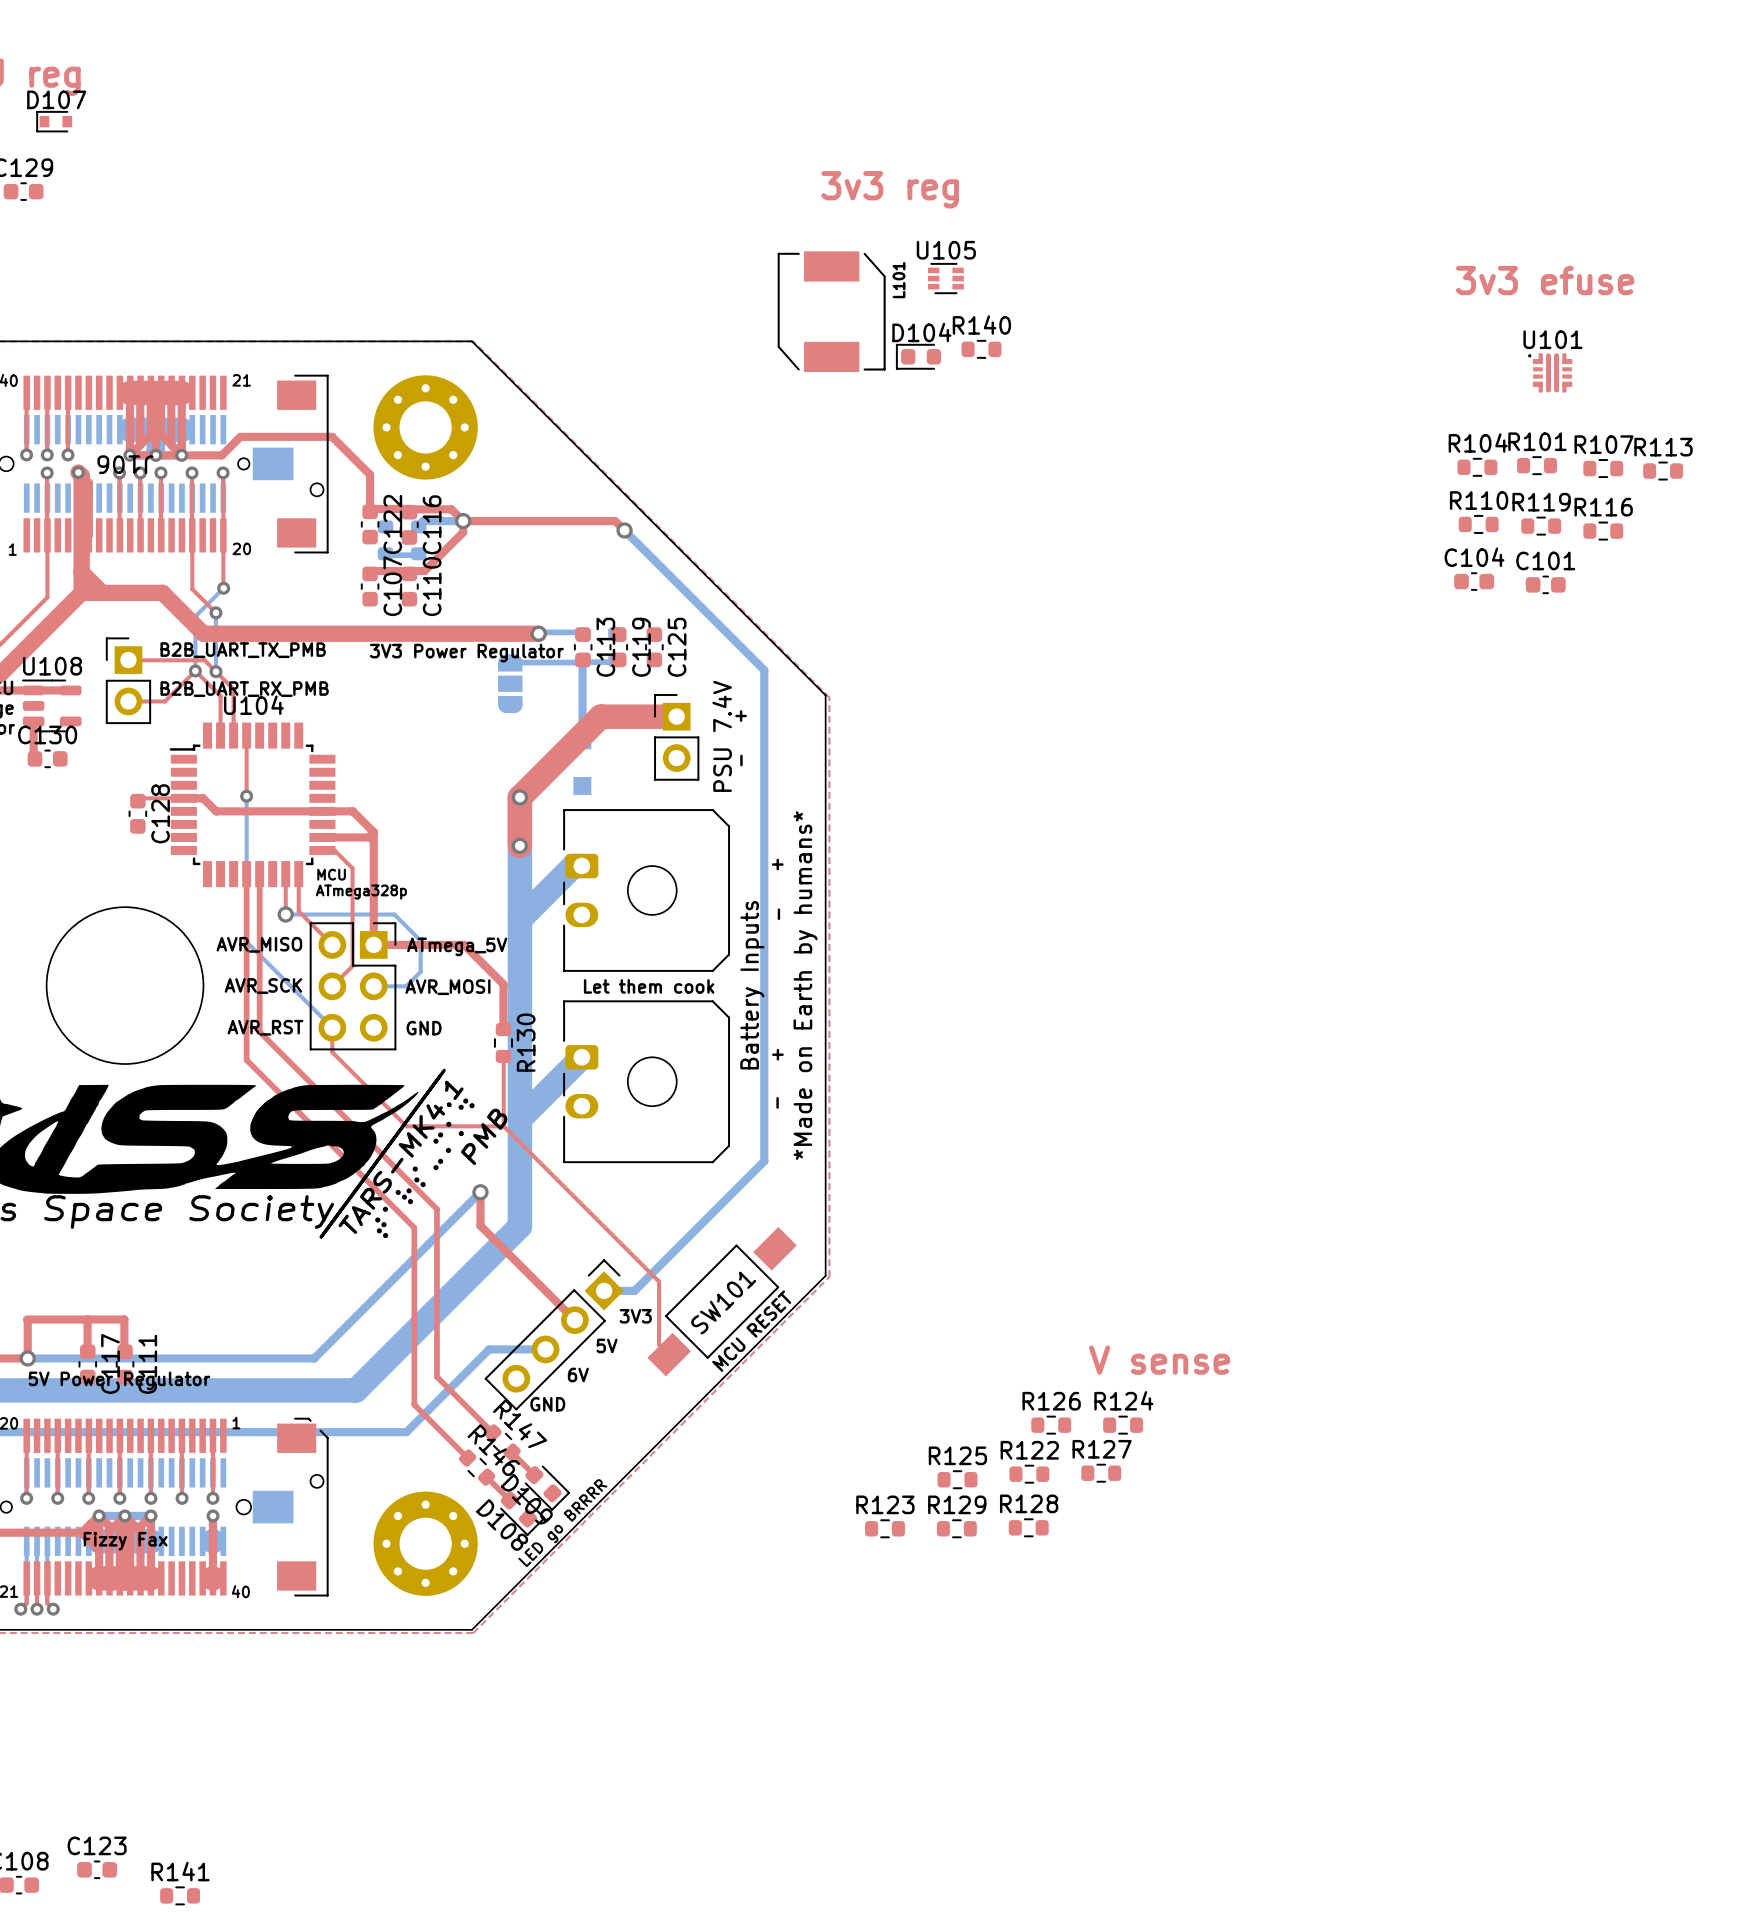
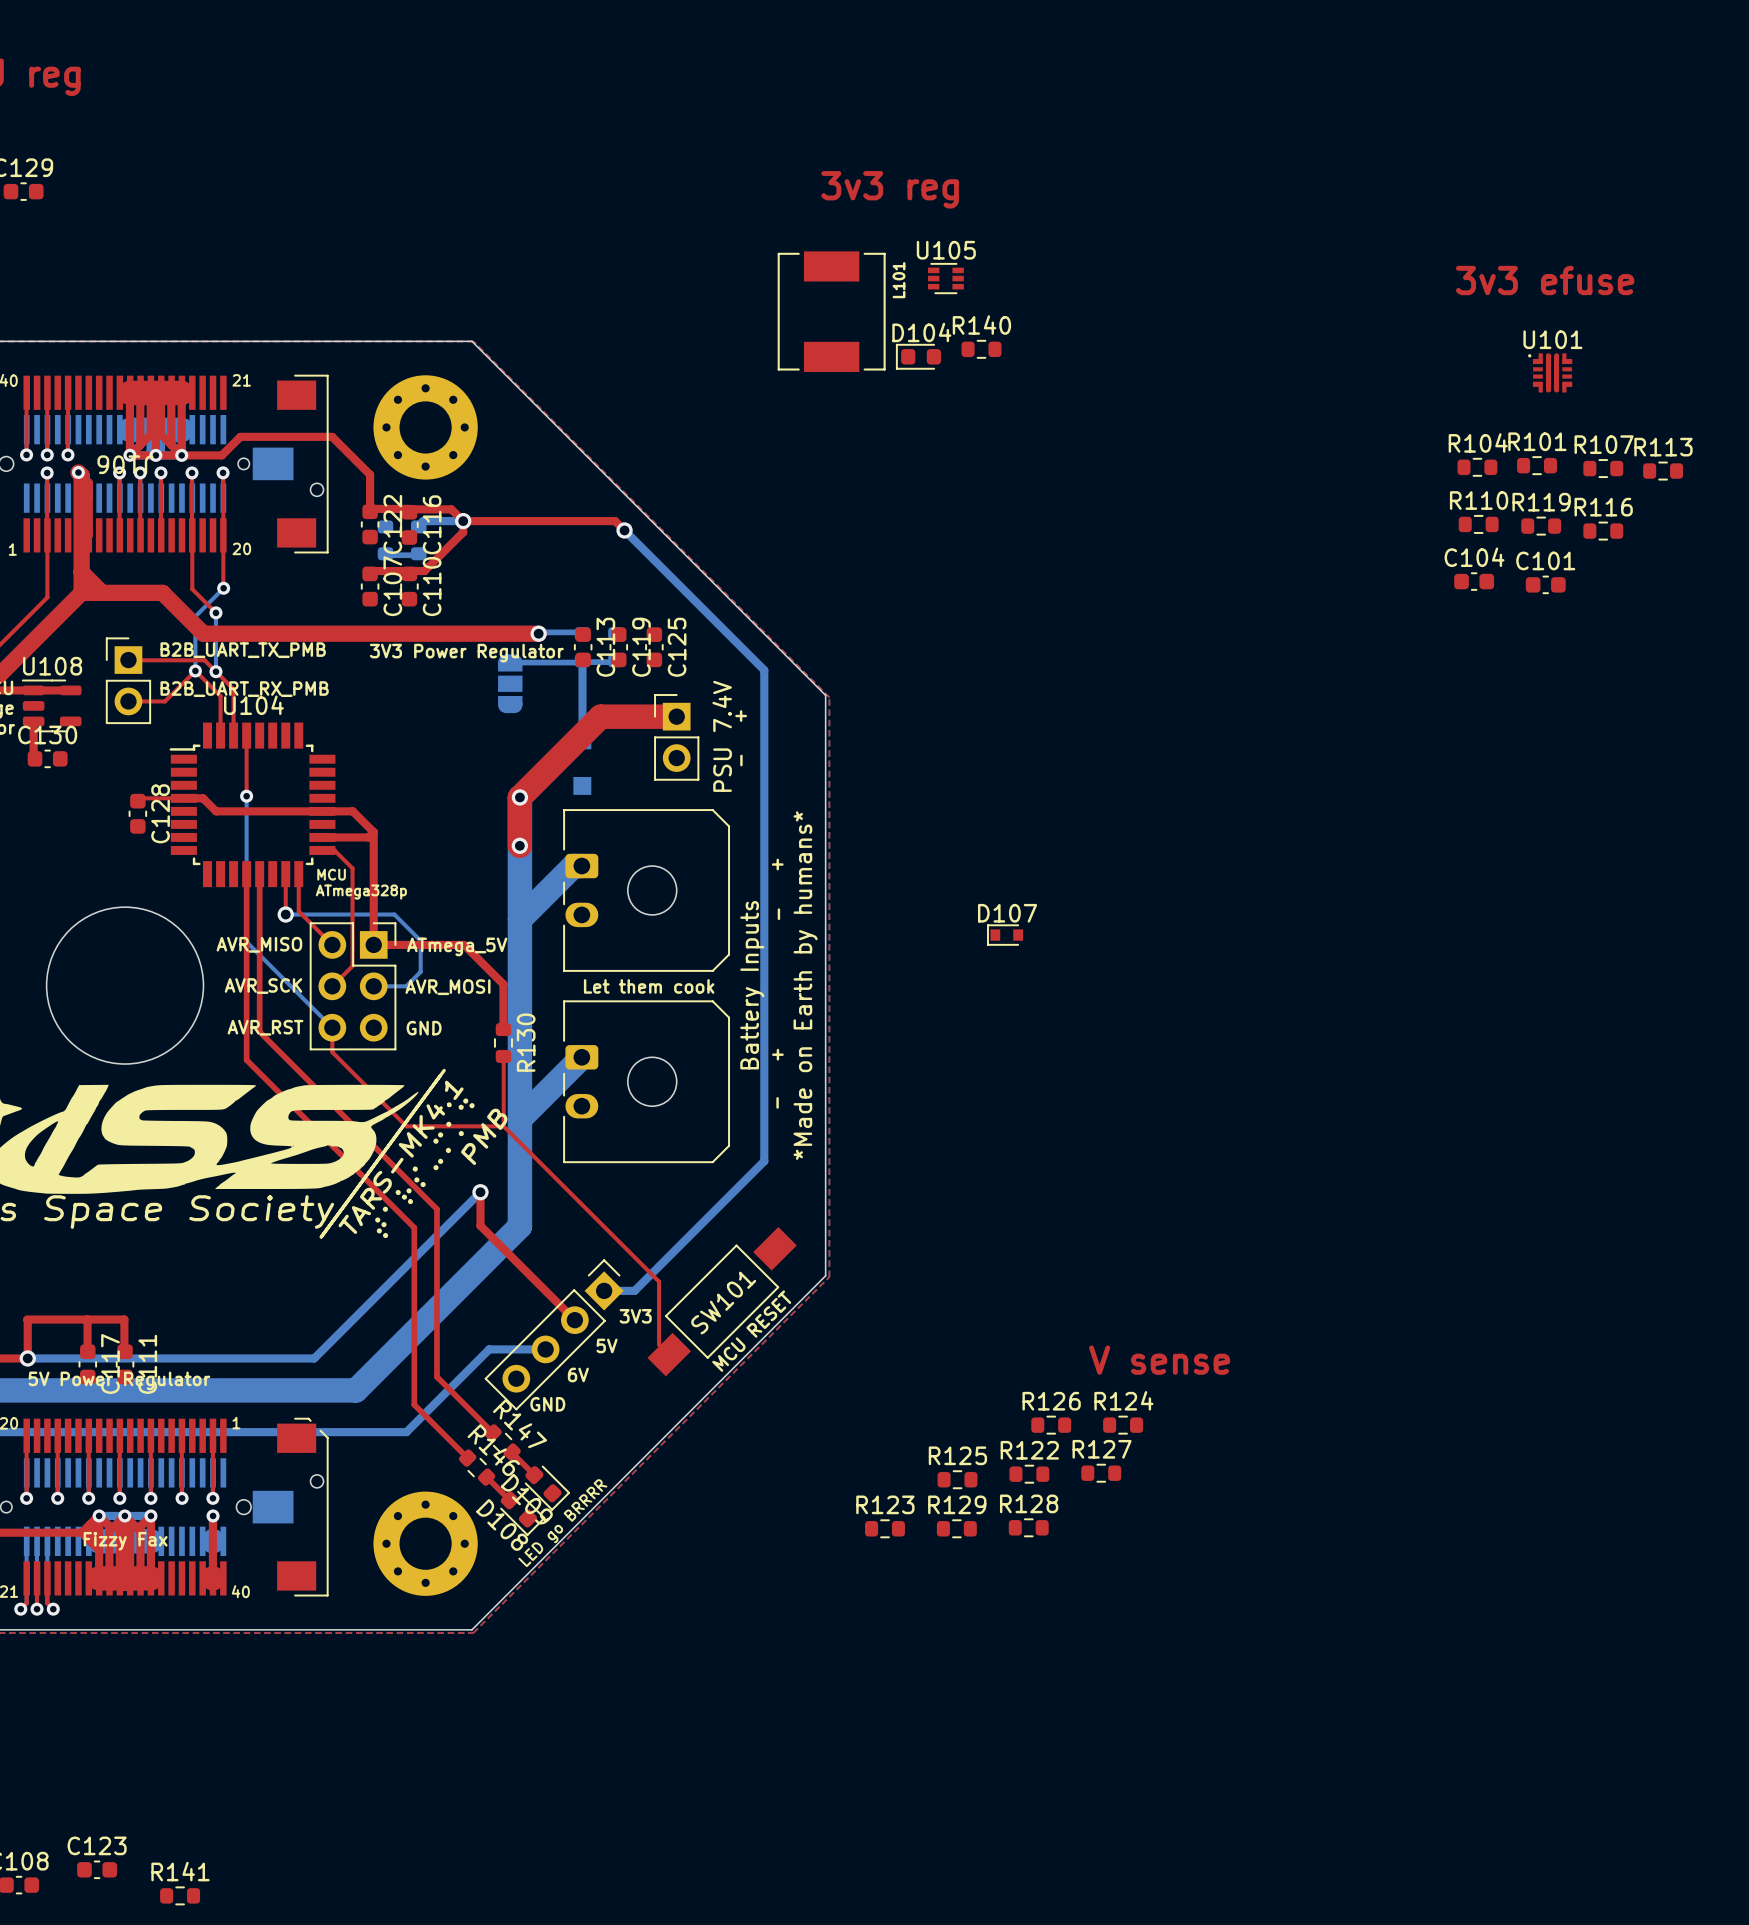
D107 position: (54, 121) -> (1005, 935)
L101 footprint: [777, 251, 886, 372] -> [777, 251, 886, 372]

